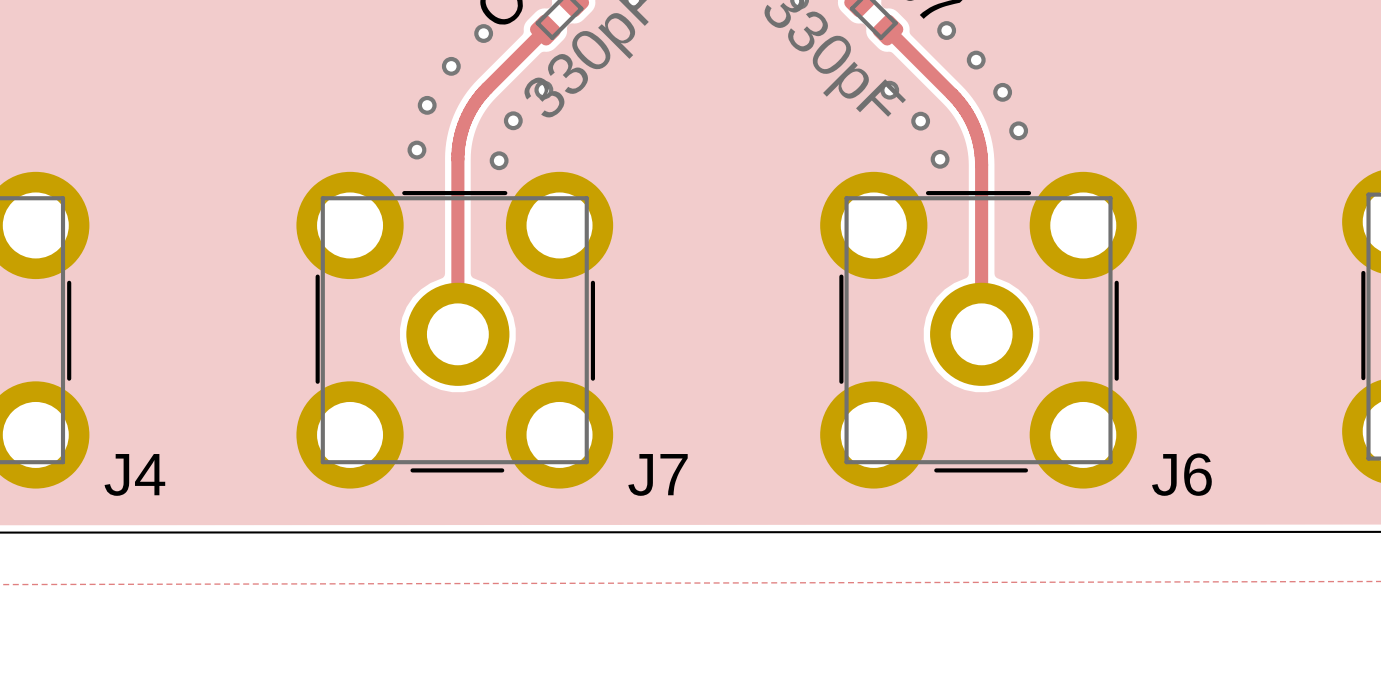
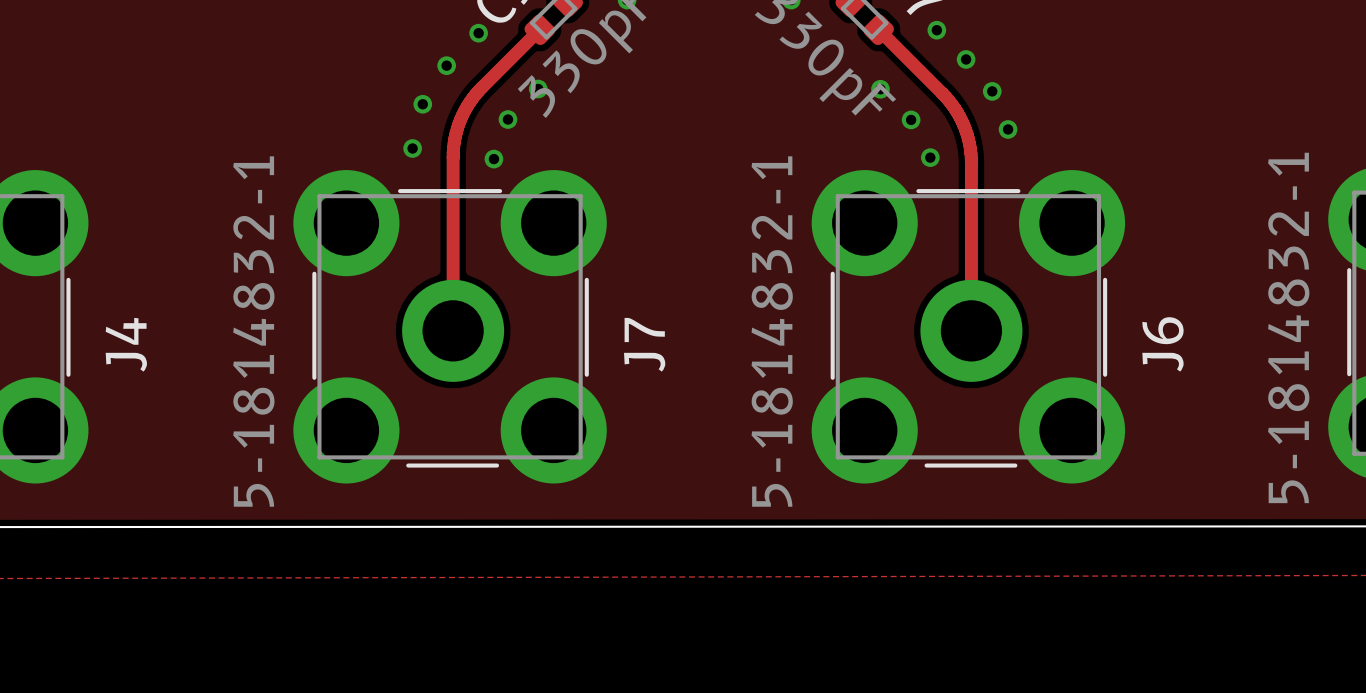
part value: none -> 5-1814832-1 (1288, 327)
J7 value: none -> 5-1814832-1 (253, 331)
J6 value: none -> 5-1814832-1 (772, 331)
J4 name rotation: 0° (134, 474) -> 90° counterclockwise (126, 344)
J4 name position: J4 (134, 474) -> J4 (126, 344)
J7 name rotation: 0° (658, 474) -> 90° counterclockwise (644, 344)
J7 name position: J7 (658, 474) -> J7 (644, 344)
J6 name rotation: 0° (1181, 474) -> 90° counterclockwise (1162, 344)
J6 name position: J6 (1181, 474) -> J6 (1162, 344)

